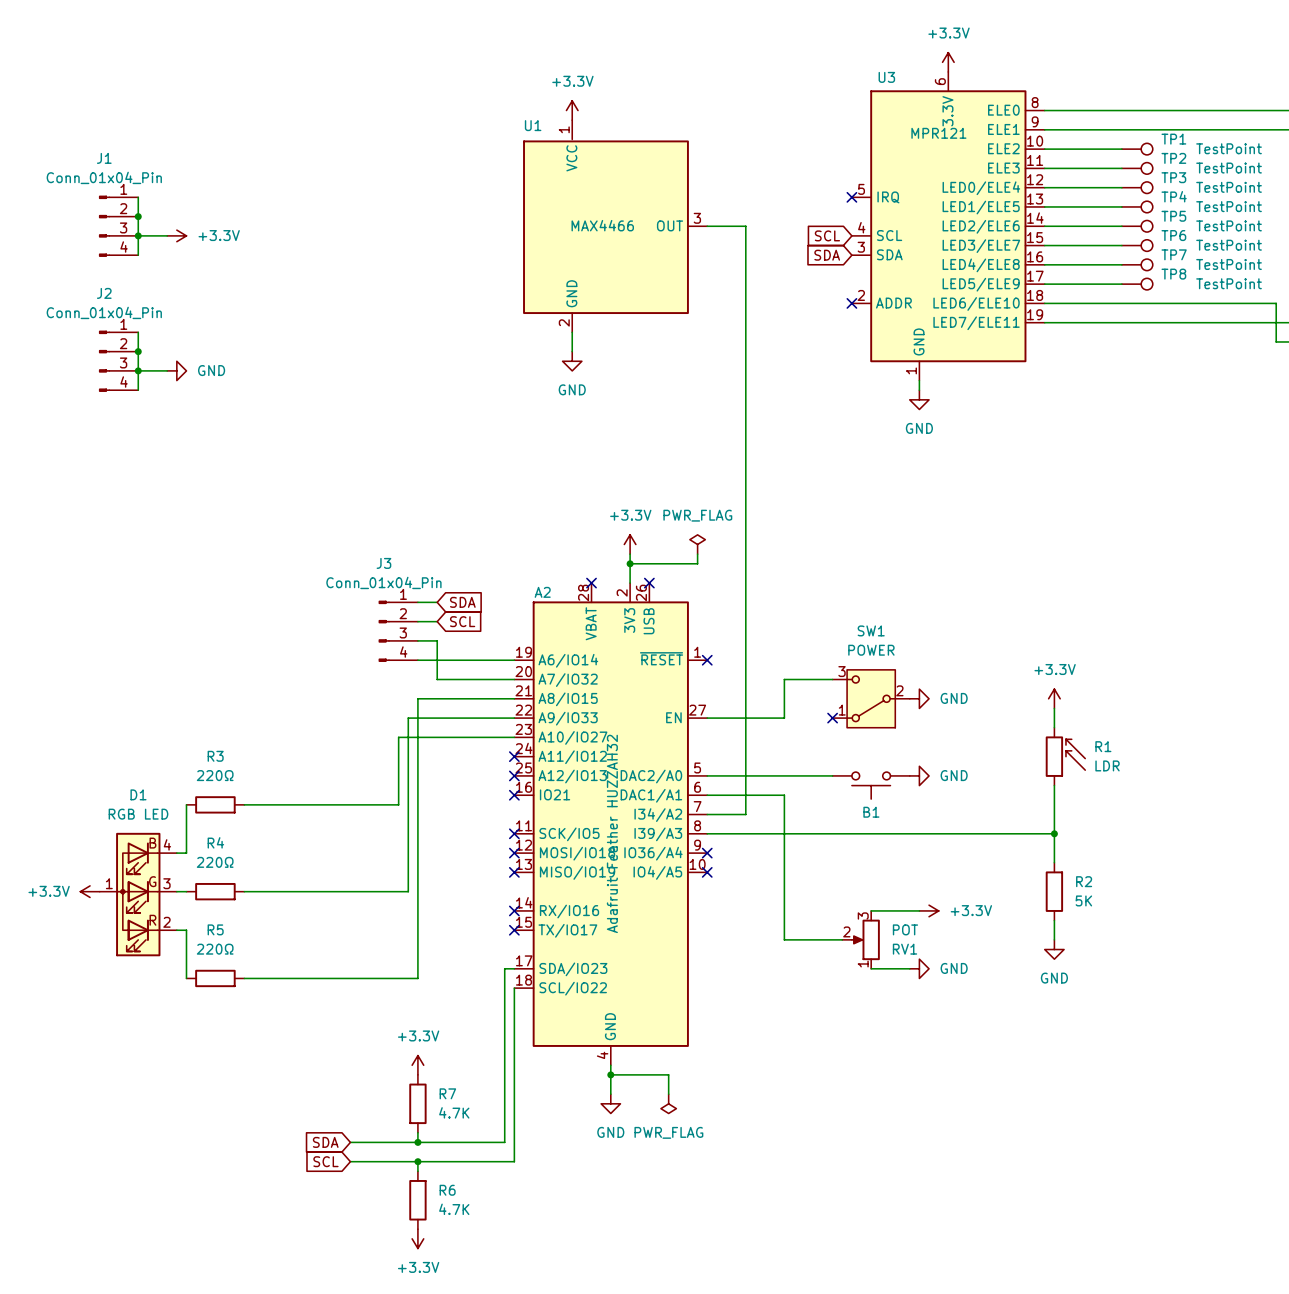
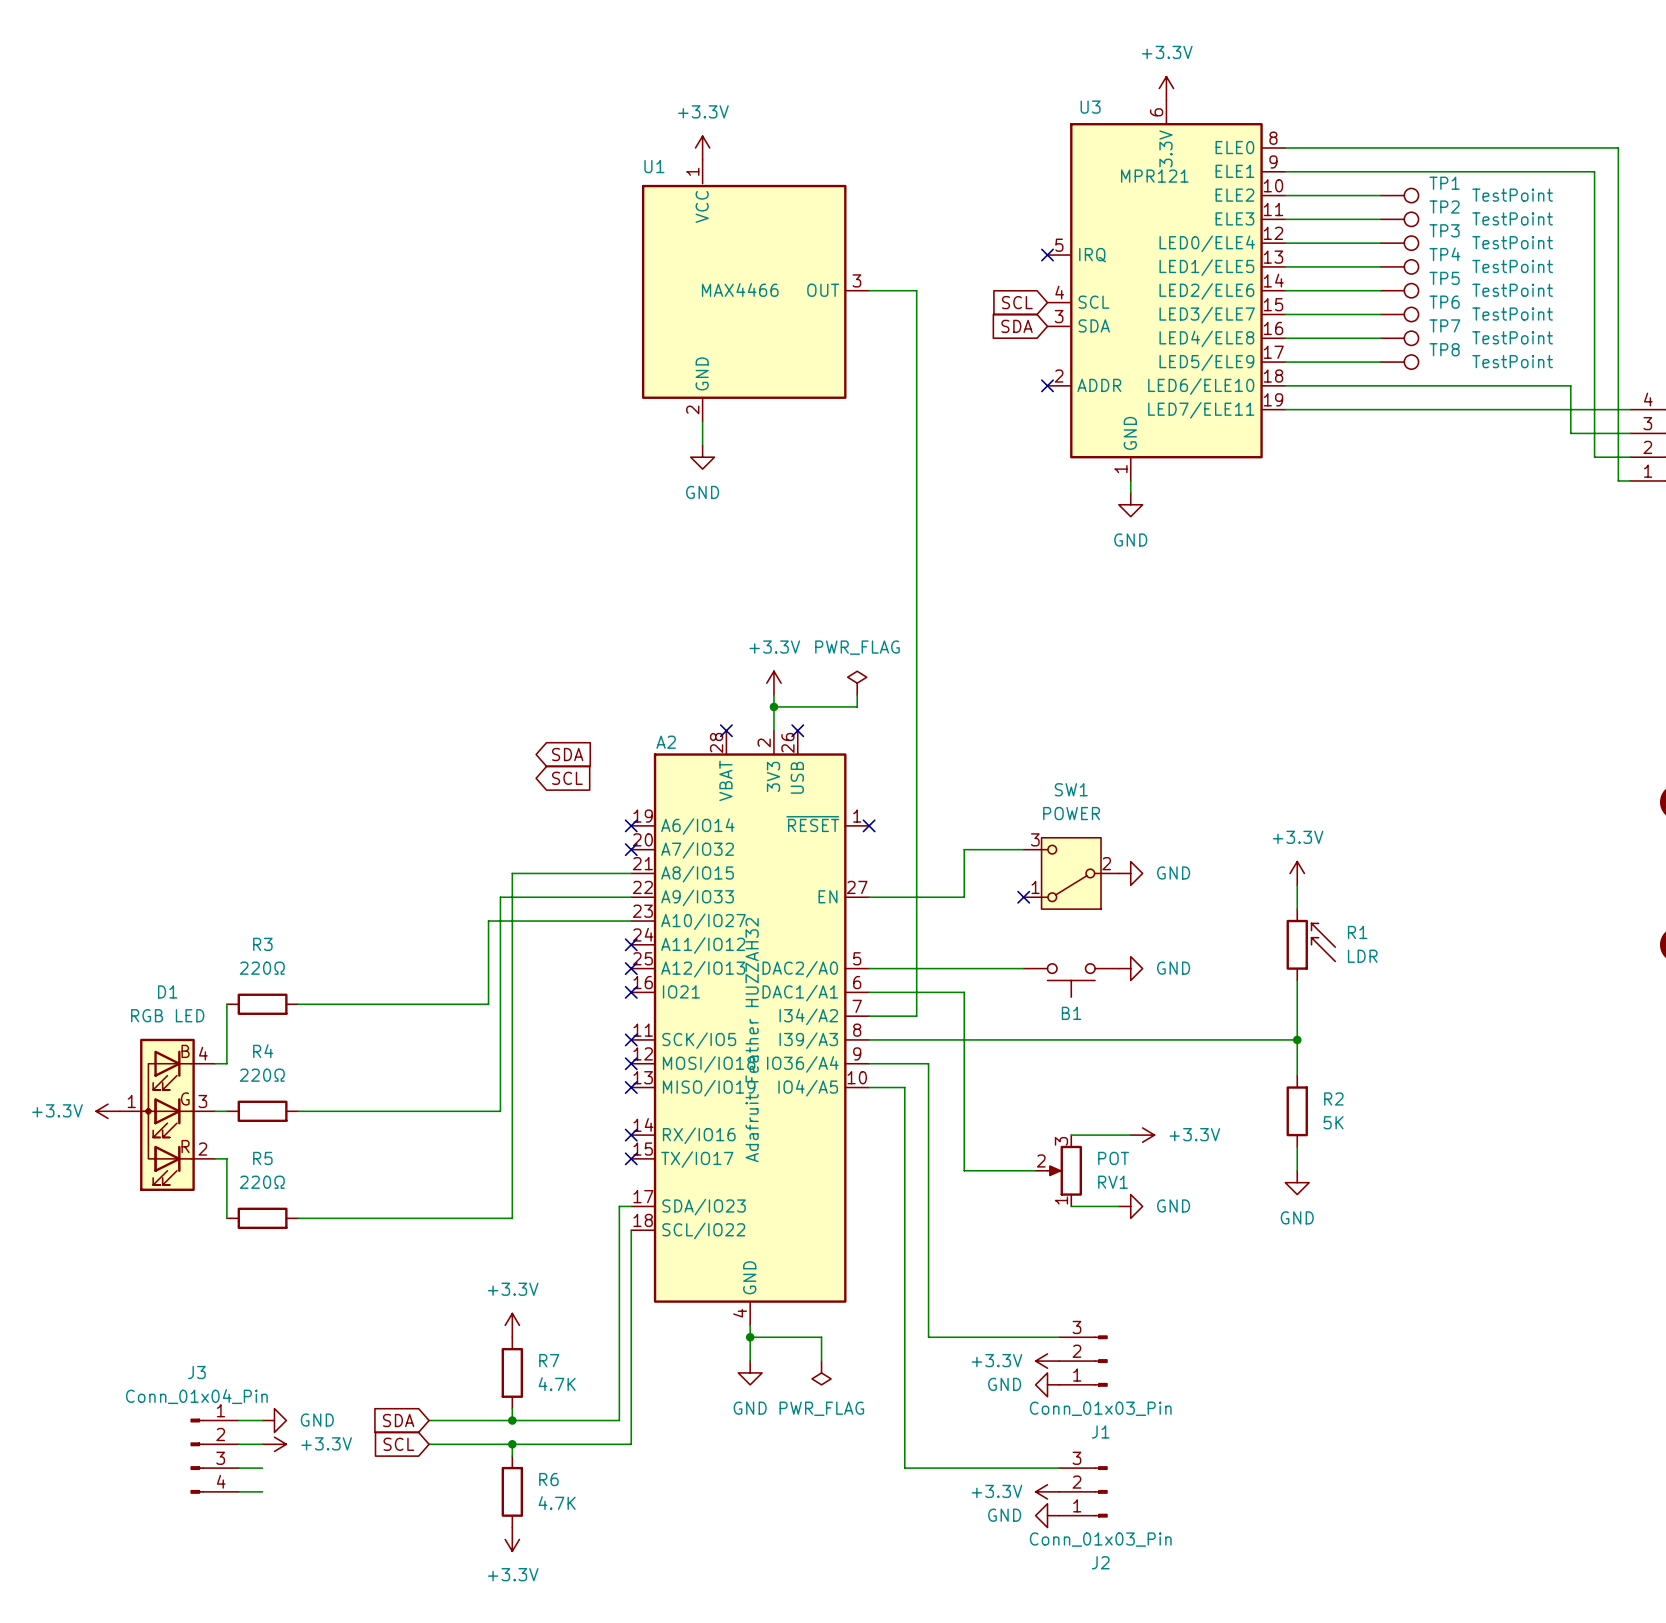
J1 name position: J1 (104, 158) -> J1 (1100, 1431)
J1 value: Conn_01x04_Pin (104, 177) -> Conn_01x03_Pin (1100, 1408)
J1 symbol: [99, 195, 139, 257] -> [1059, 1335, 1108, 1387]
wire: (138, 197) (138, 255) -> none
junction: (138, 216) -> none
wire: (138, 235) (167, 235) -> none
junction: (138, 235) -> none
power symbol: +3.3V (176, 235) -> none
J2 name position: J2 (104, 293) -> J2 (1100, 1562)
J2 value: Conn_01x04_Pin (104, 312) -> Conn_01x03_Pin (1100, 1539)
J2 symbol: [99, 330, 139, 392] -> [1059, 1466, 1108, 1518]
wire: (138, 332) (138, 390) -> none
junction: (138, 351) -> none
wire: (138, 370) (167, 370) -> none
junction: (138, 370) -> none
power symbol: GND (176, 370) -> none
wire: (417, 602) (437, 602) -> none
wire: (417, 621) (437, 621) -> none
J3 position: (398, 631) -> (214, 1456)
wire: (417, 640) (437, 640) (437, 679) (514, 679) -> none
wire: (417, 660) (514, 660) -> none
no-connect mark: none -> (631, 825)
no-connect mark: none -> (631, 849)
wire: none -> (869, 1063) (928, 1063) (928, 1337) (1059, 1337)
no-connect mark: (707, 853) -> none
wire: none -> (869, 1087) (904, 1087) (904, 1468) (1059, 1468)
no-connect mark: (707, 872) -> none
power symbol: none -> +3.3V (1047, 1361)
power symbol: none -> GND (1047, 1384)
wire: none -> (238, 1420) (262, 1420)
power symbol: none -> GND (274, 1420)
wire: none -> (238, 1444) (262, 1444)
power symbol: none -> +3.3V (274, 1444)
wire: none -> (238, 1468) (262, 1468)
wire: none -> (238, 1491) (262, 1491)
power symbol: none -> +3.3V (1047, 1491)
power symbol: none -> GND (1047, 1515)

